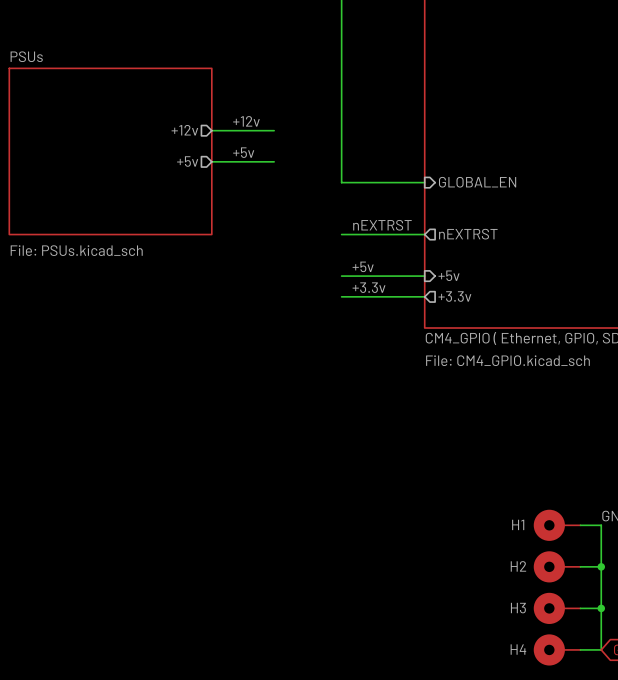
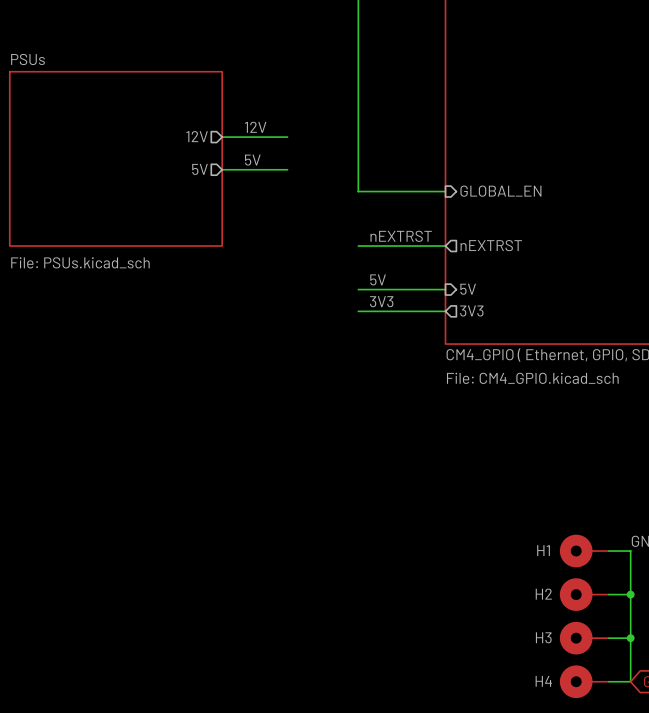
label: +12v (246, 121) -> 12V (255, 127)
sheet pin: +12v (184, 130) -> 12V (197, 136)
label: +5v (243, 152) -> 5V (252, 160)
sheet pin: +5v (187, 161) -> 5V (200, 169)
label: +5v (363, 266) -> 5V (378, 279)
sheet pin: +5v (449, 275) -> 5V (468, 289)
label: +3.3v (369, 287) -> 3V3 (381, 301)
sheet pin: +3.3v (454, 296) -> 3V3 (471, 311)

